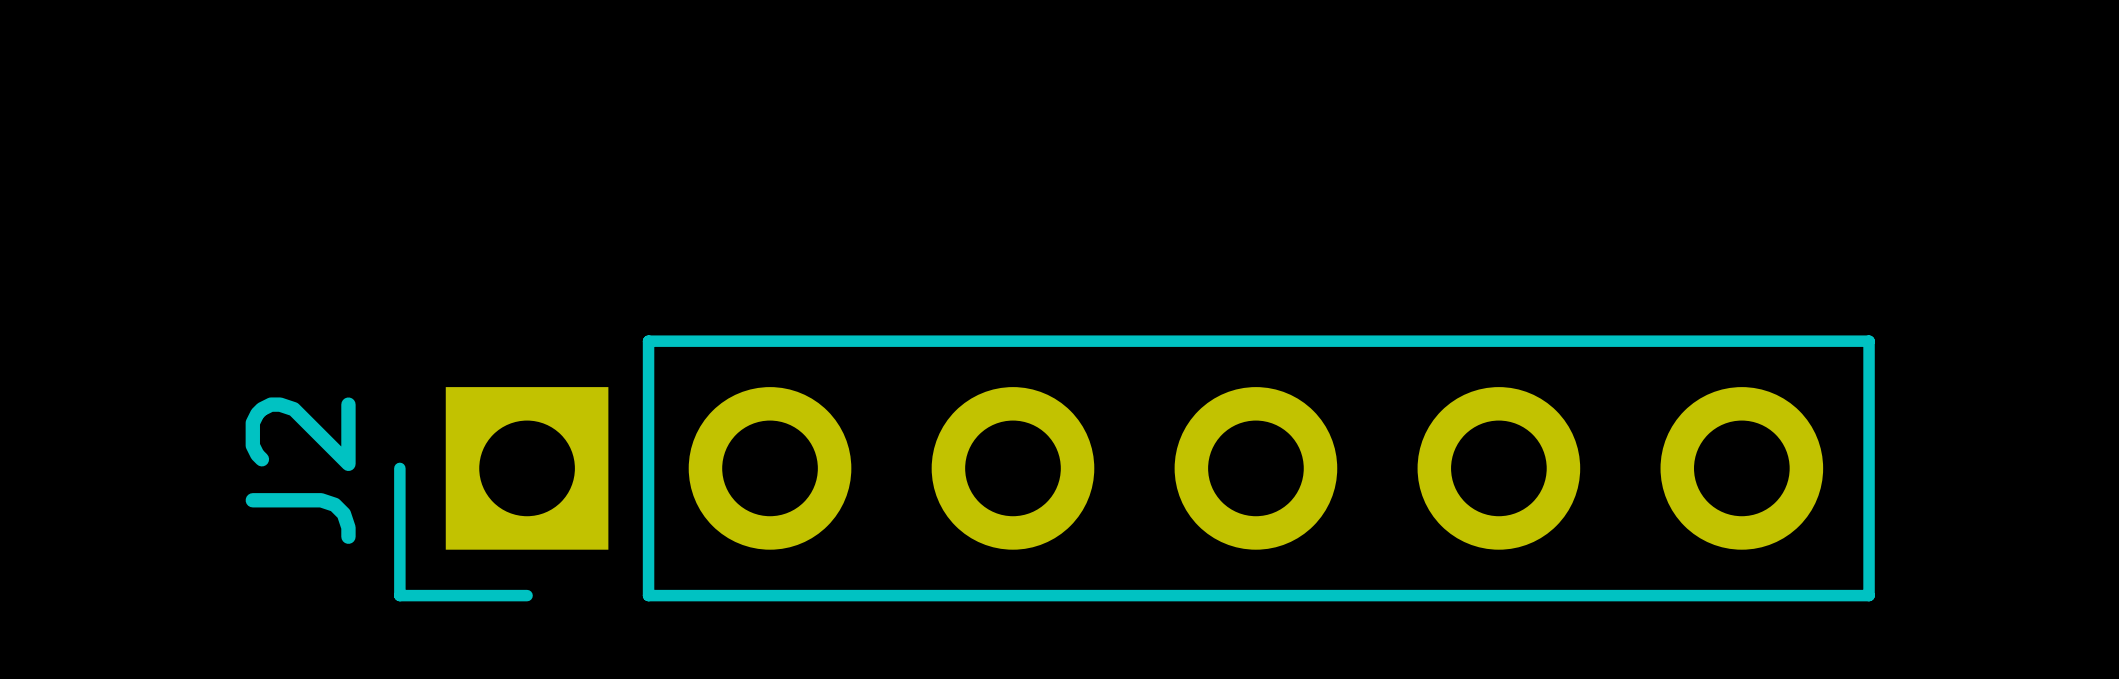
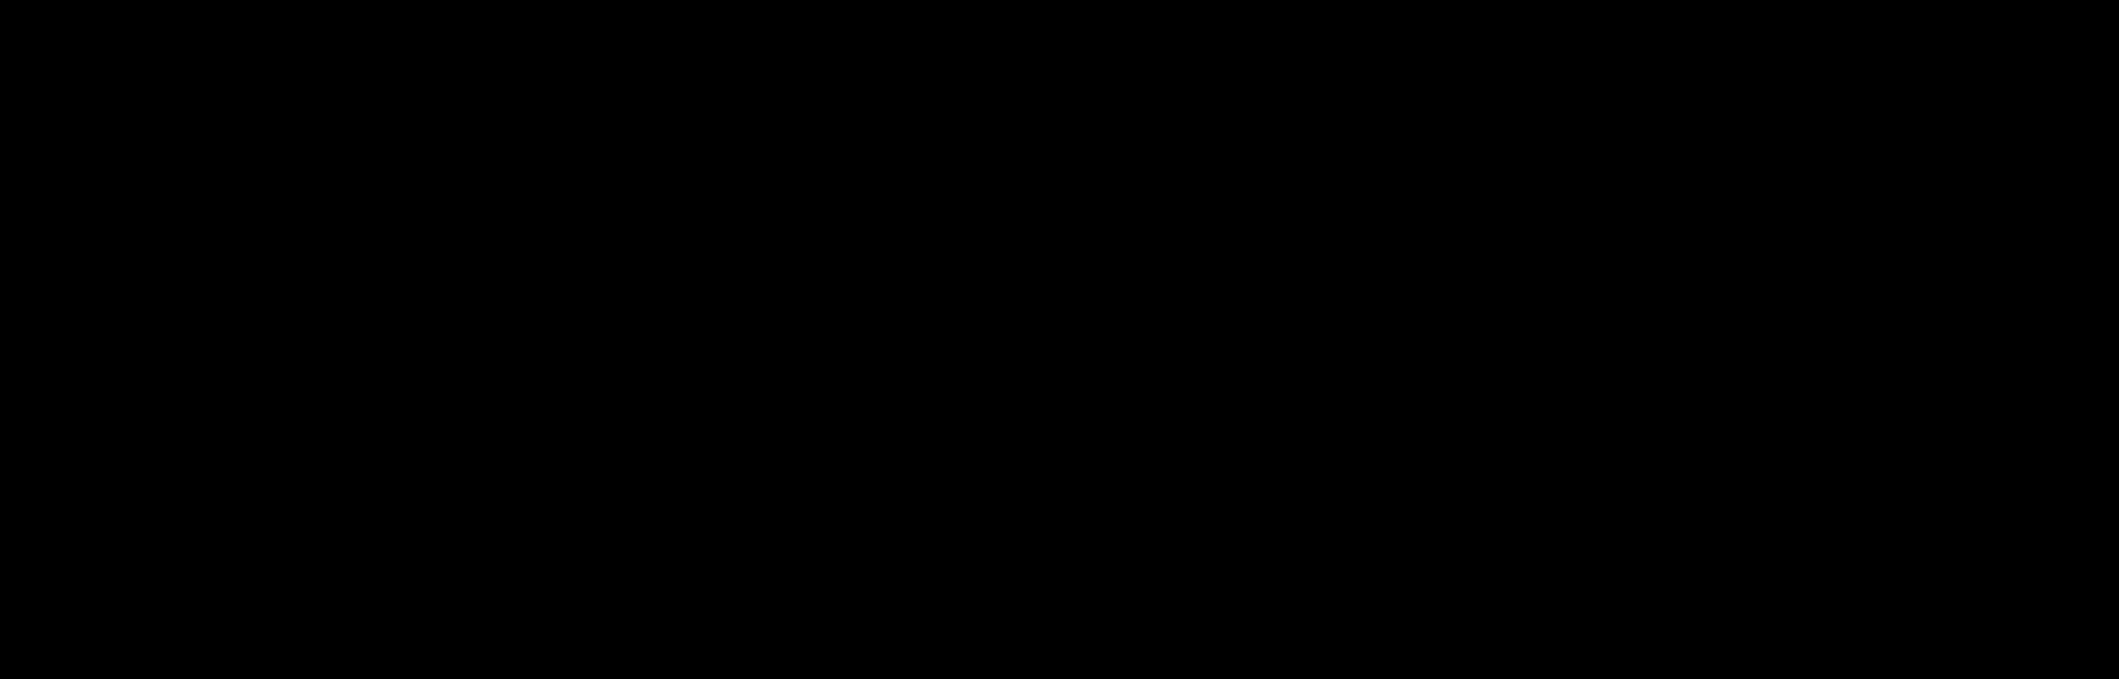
J2: (1134, 468) -> none

